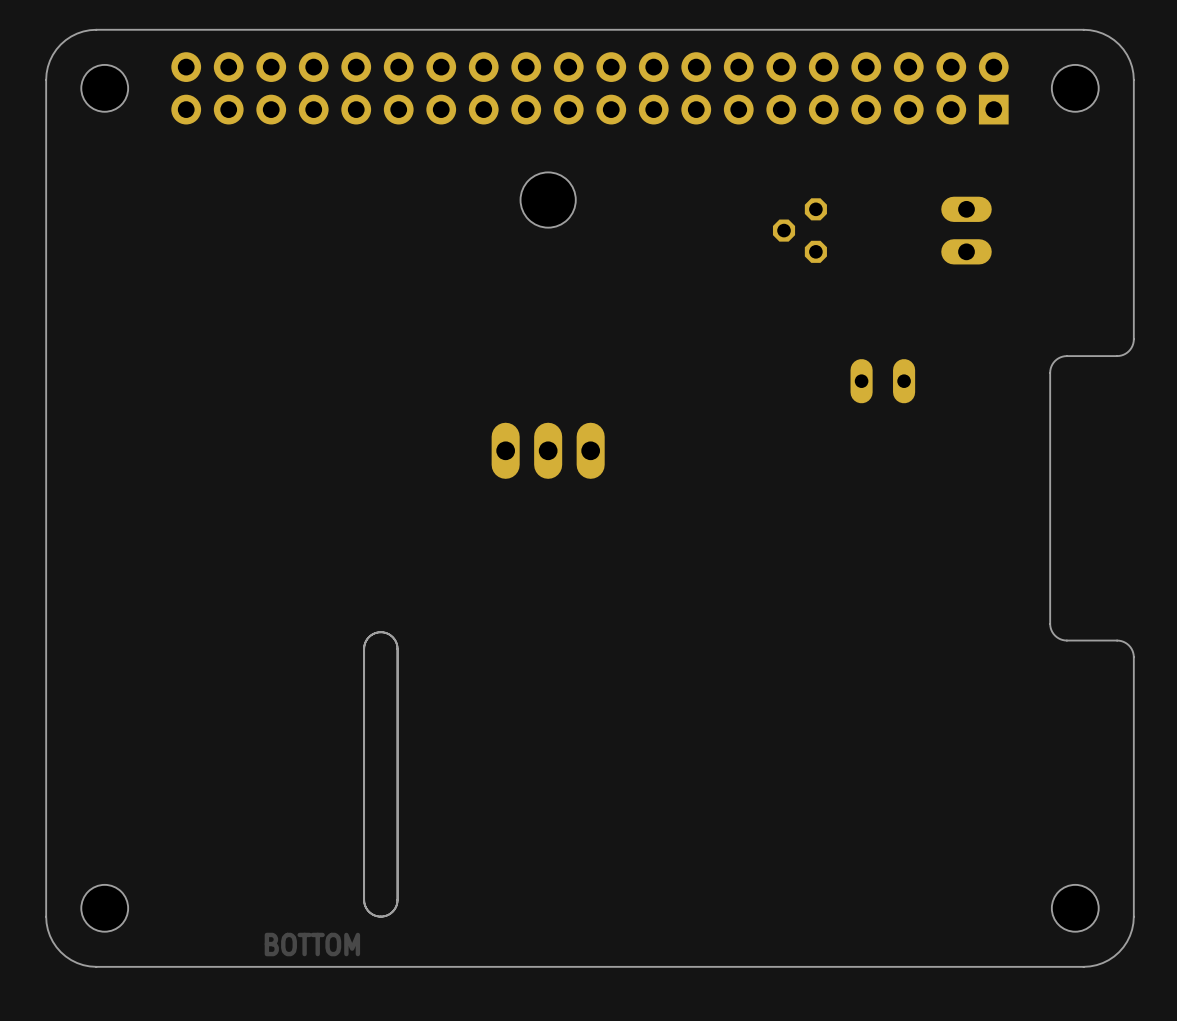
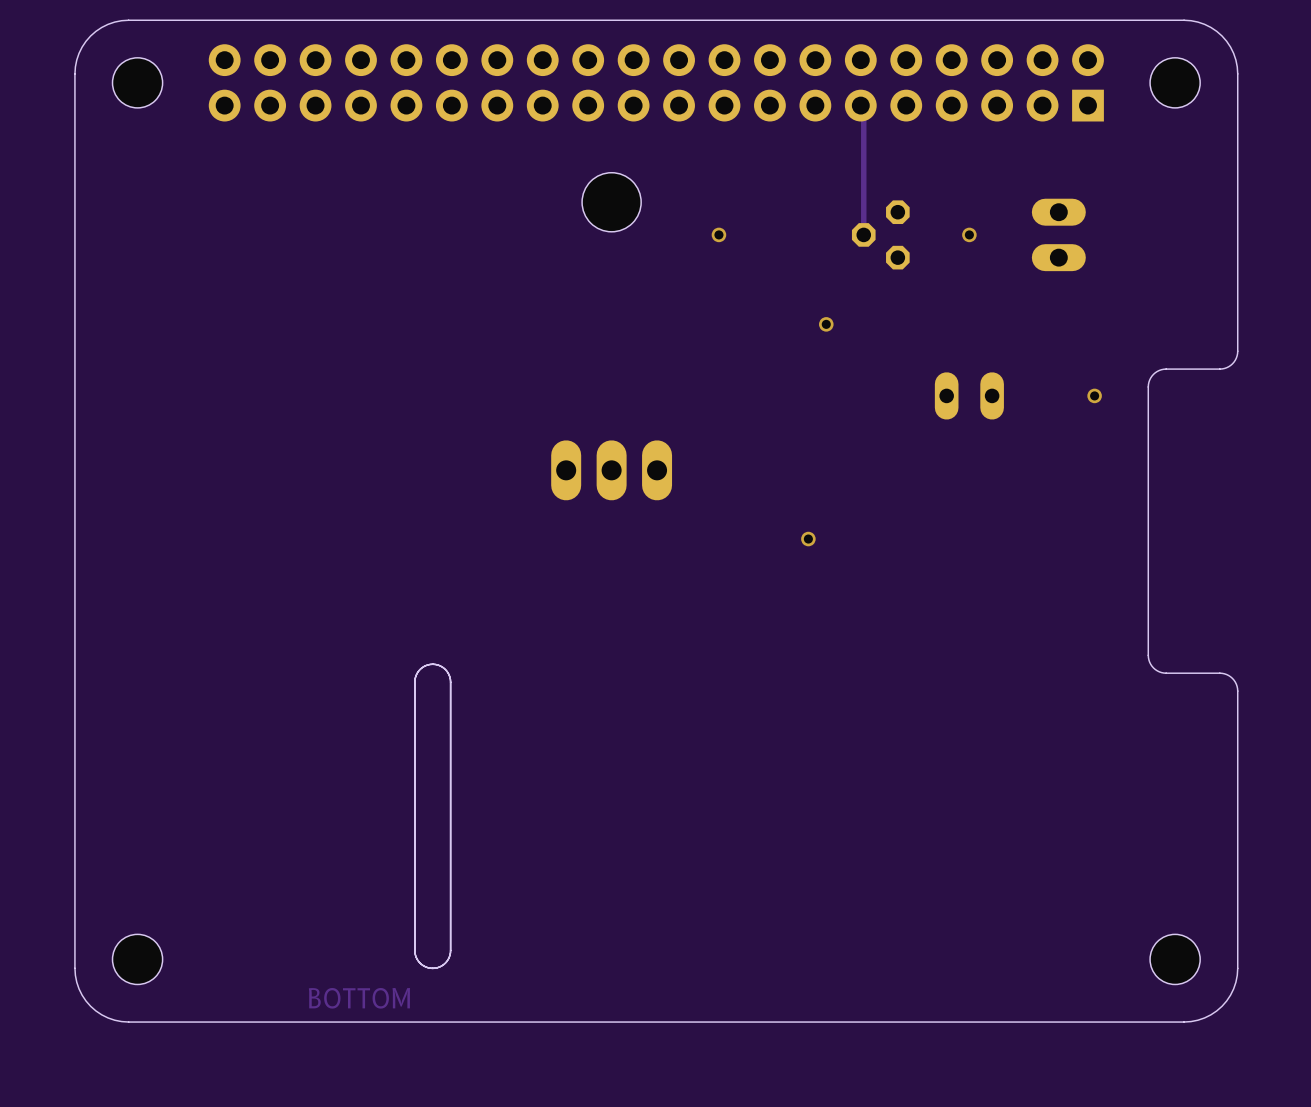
track: none -> (860, 105) (863, 108) (863, 234)
via: none -> (718, 234)
via: none -> (969, 234)
via: none -> (826, 324)
via: none -> (1094, 395)
via: none -> (808, 539)

